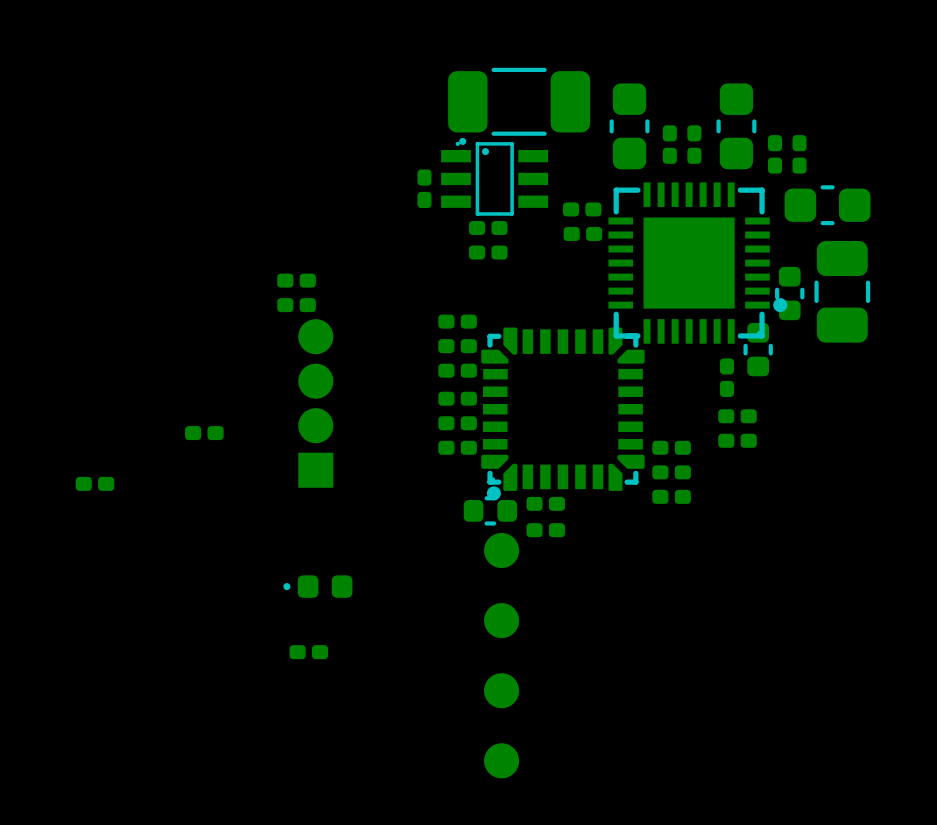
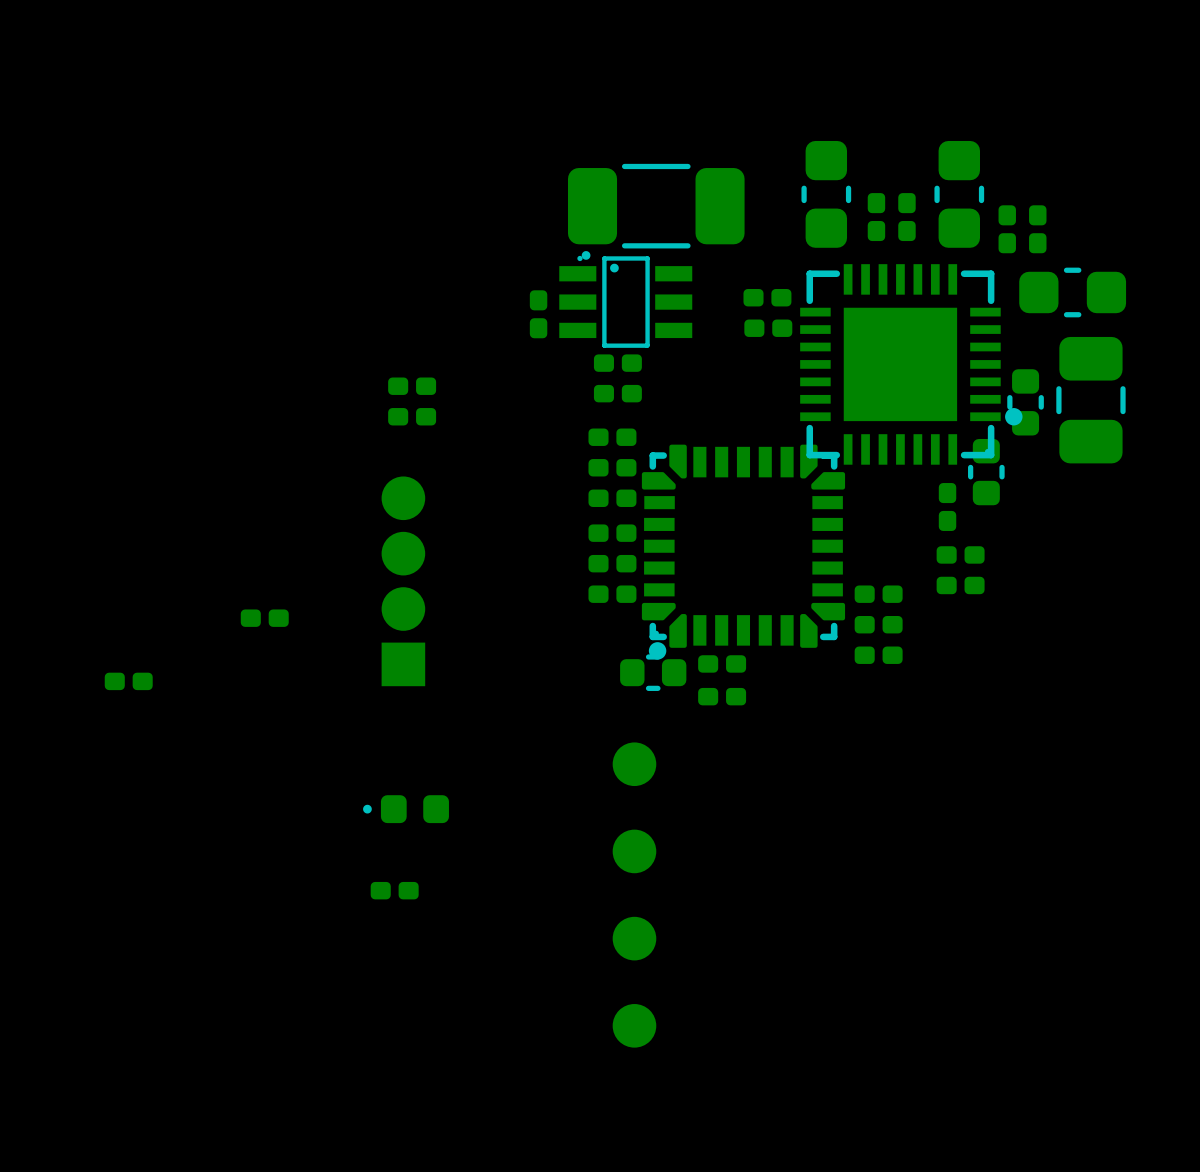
part: none -> (876, 217)
part: none -> (906, 217)
part: none -> (1007, 229)
part: none -> (1037, 229)
part position: (629, 126) -> (826, 194)
part position: (736, 126) -> (959, 194)
part: (669, 144) -> none
part: (694, 144) -> none
part: (775, 154) -> none
part: (799, 154) -> none
part: none -> (767, 297)
part: none -> (768, 328)
part position: (827, 205) -> (1072, 292)
part: (582, 209) -> none
part: (582, 233) -> none
part: none -> (412, 386)
part: none -> (1025, 402)
part position: (697, 263) -> (911, 364)
part: none -> (412, 416)
part: (296, 280) -> none
part: none -> (612, 437)
part position: (842, 291) -> (1090, 400)
part: (789, 293) -> none
part: (296, 305) -> none
part: none -> (612, 467)
part: none -> (986, 472)
part: (457, 321) -> none
part footprint: [743, 323, 773, 377] -> [938, 483, 957, 531]
part: none -> (612, 498)
part: (457, 346) -> none
part: none -> (612, 533)
part: (457, 370) -> none
part: (726, 377) -> none
part: none -> (960, 554)
part: none -> (612, 563)
part: (457, 398) -> none
part: none -> (960, 585)
part: none -> (612, 594)
part position: (562, 413) -> (743, 552)
part: none -> (878, 594)
part: (737, 416) -> none
part: (457, 423) -> none
part: none -> (878, 624)
part: (737, 440) -> none
part: (457, 447) -> none
part: (671, 447) -> none
part: none -> (878, 655)
part: none -> (722, 663)
part: (671, 472) -> none
part: none -> (722, 696)
part: (671, 496) -> none
part: (545, 503) -> none
part position: (490, 510) -> (653, 672)
part: (545, 530) -> none

